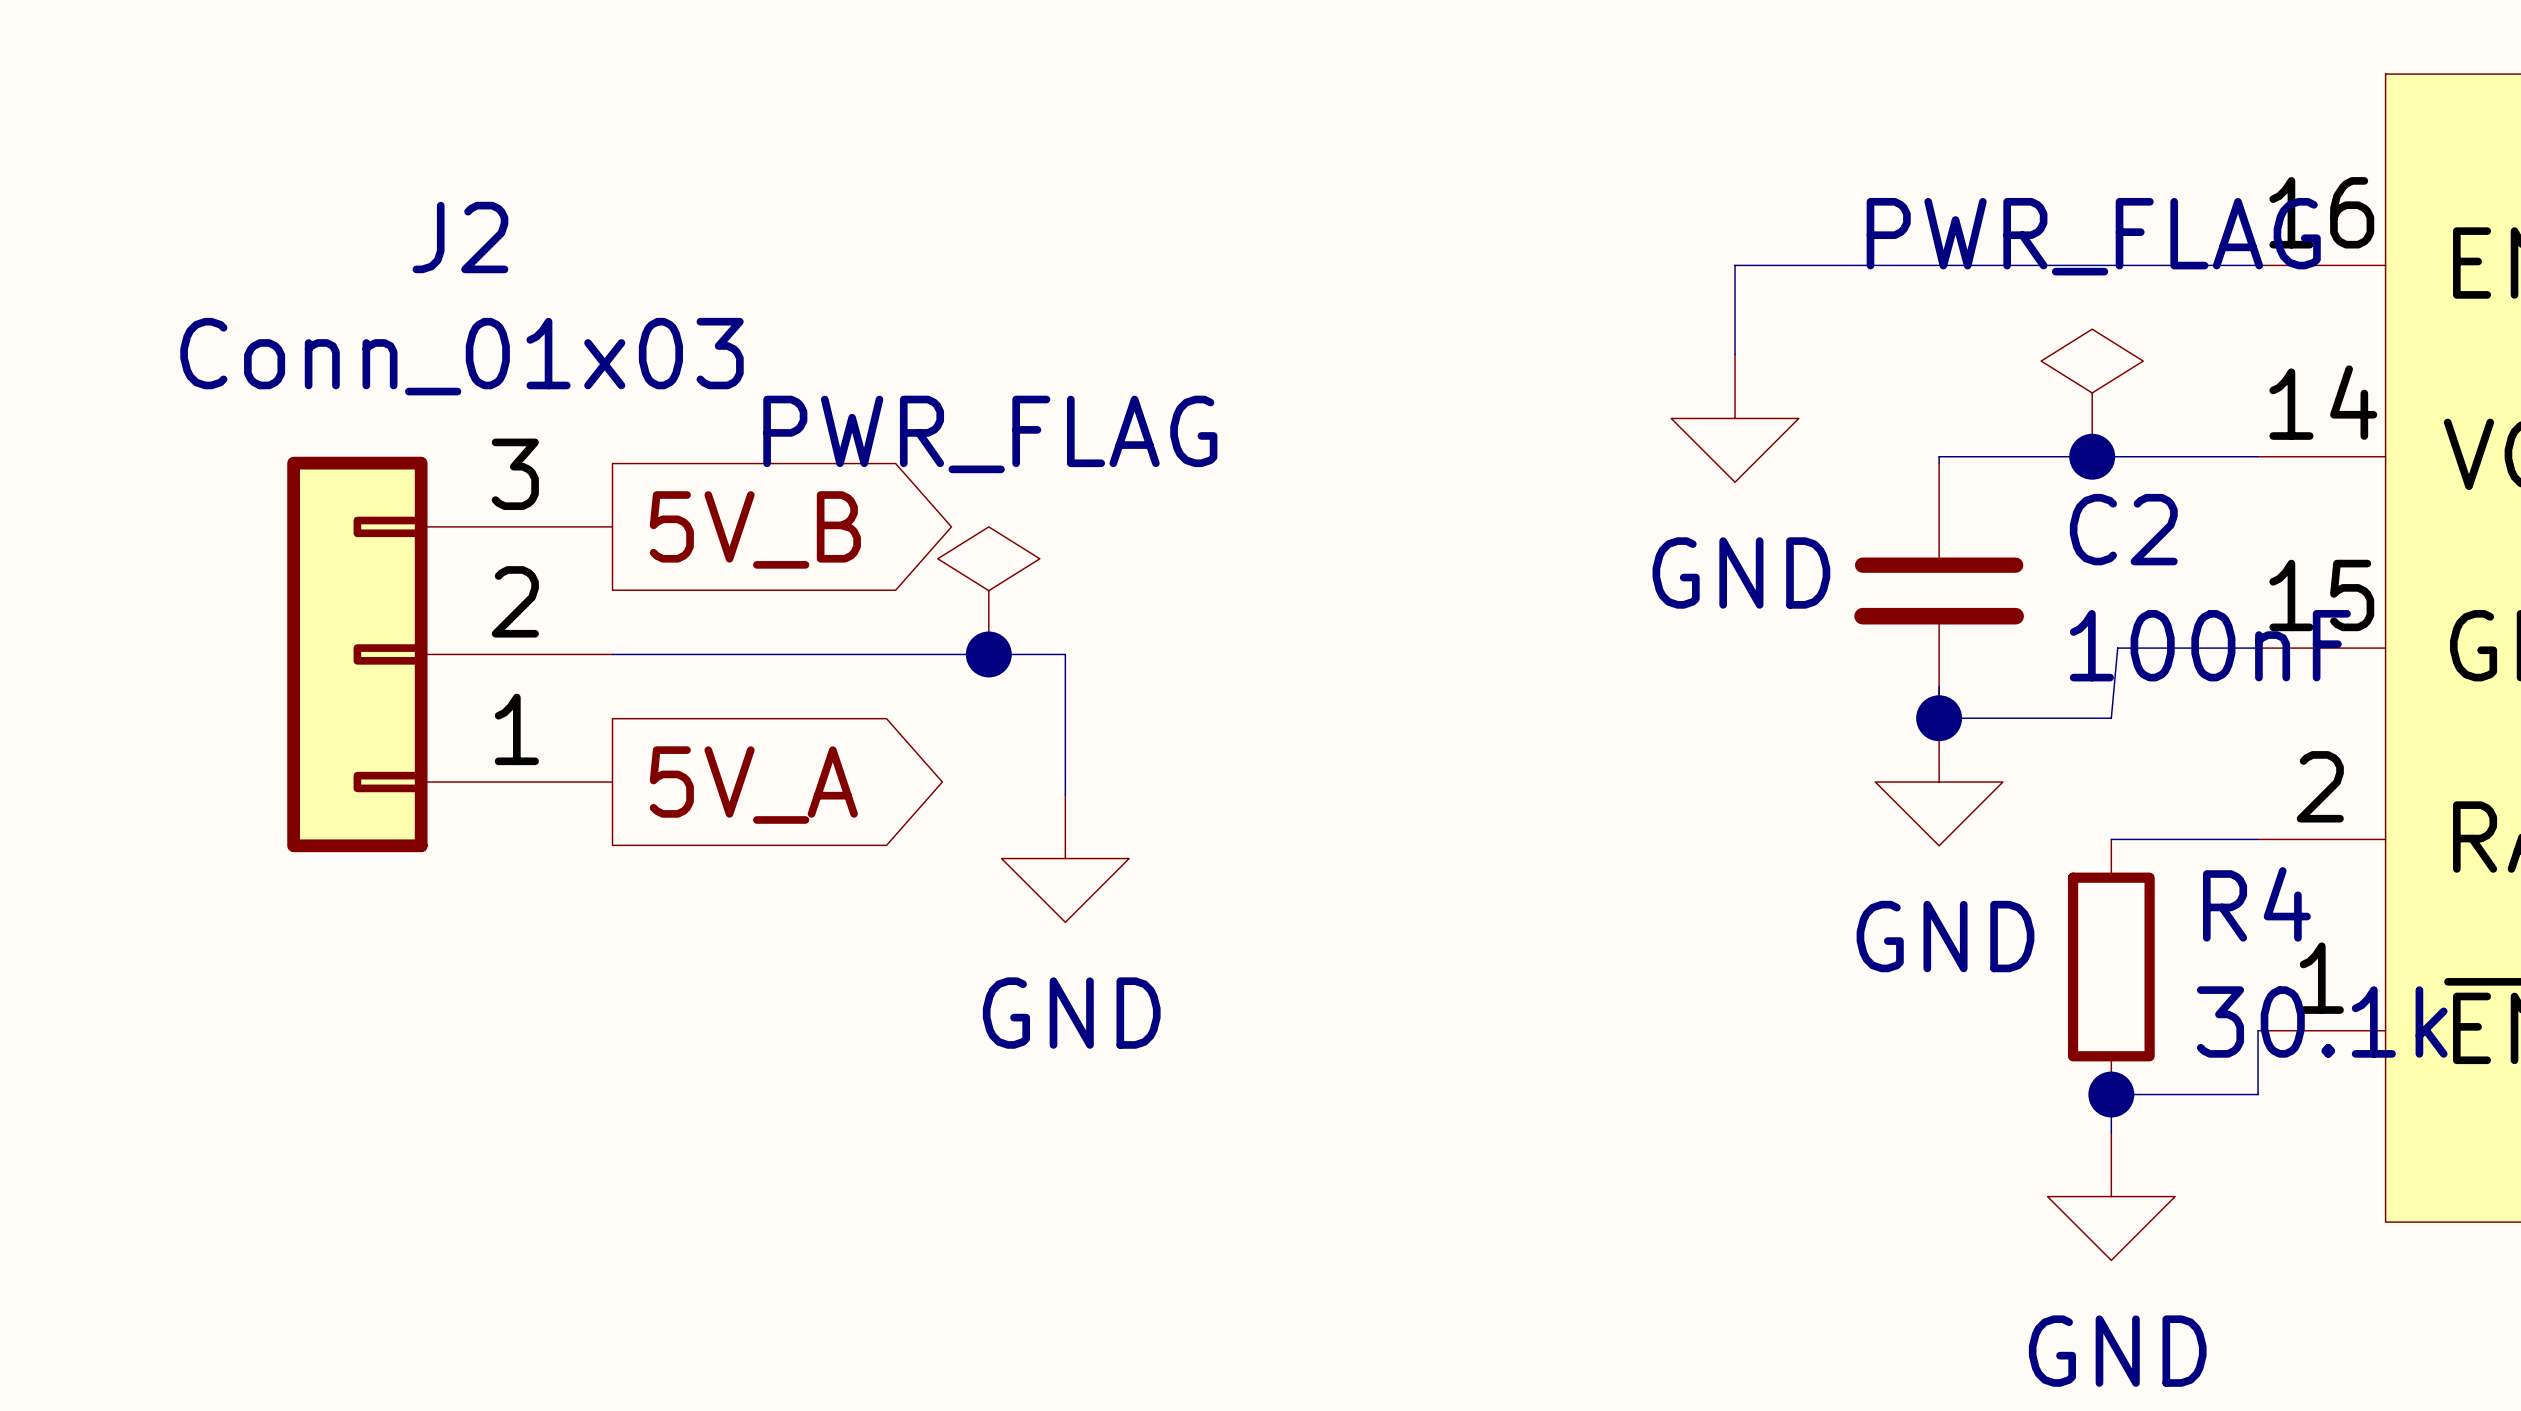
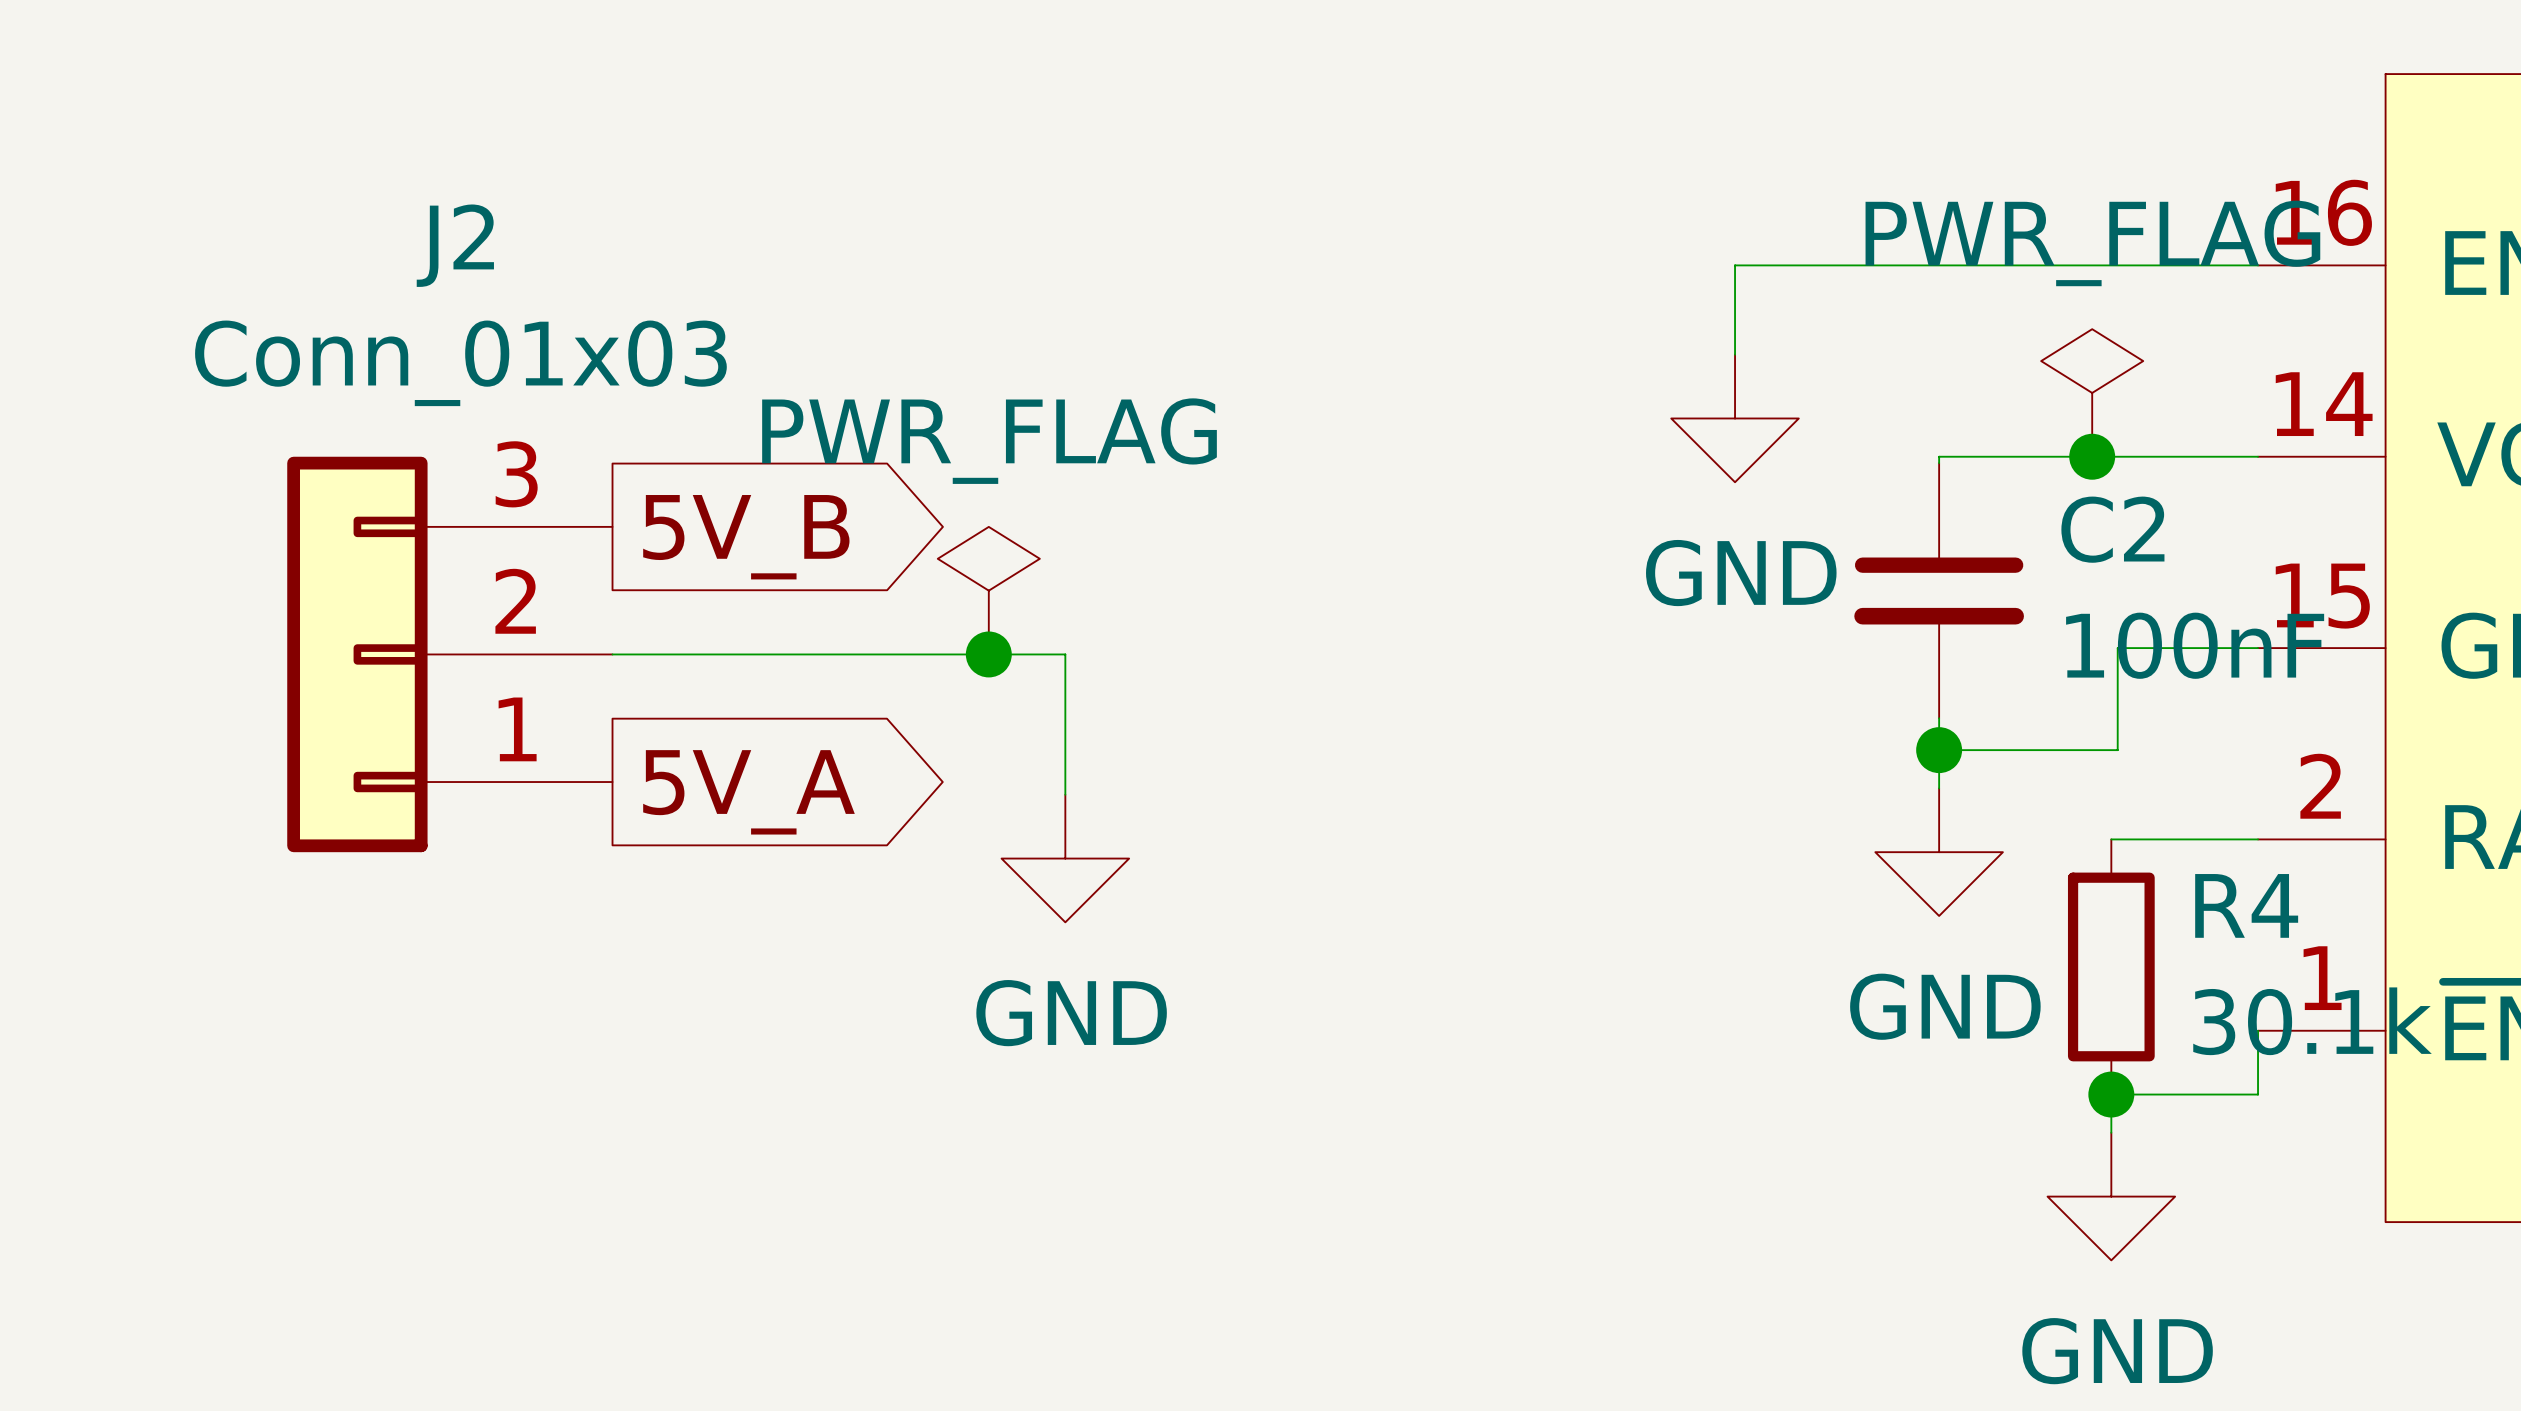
wire: (2117, 648) (2111, 718) (1939, 718) (1939, 686) -> (2117, 648) (2117, 750) (1939, 750)
junction position: (1939, 718) -> (1939, 750)
power symbol position: GND (1939, 782) -> GND (1939, 852)

